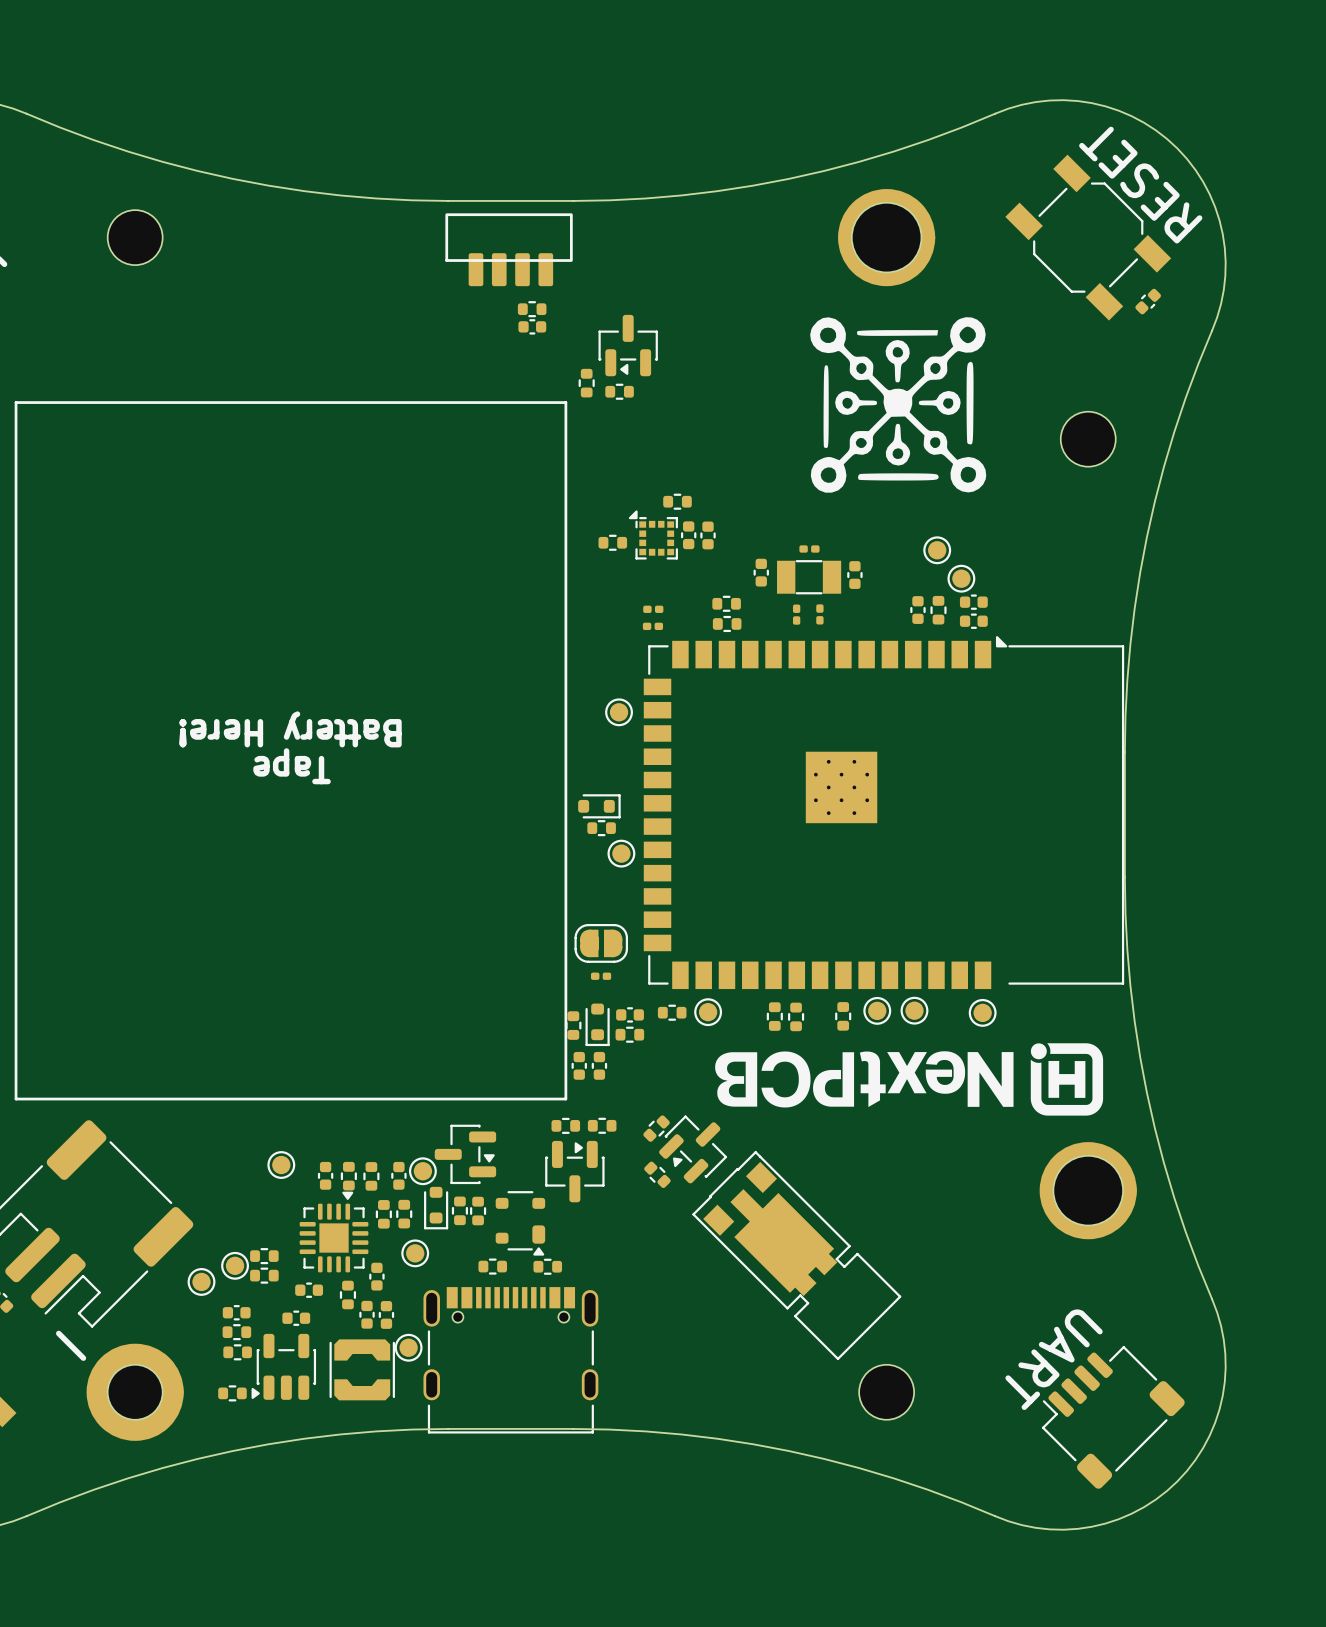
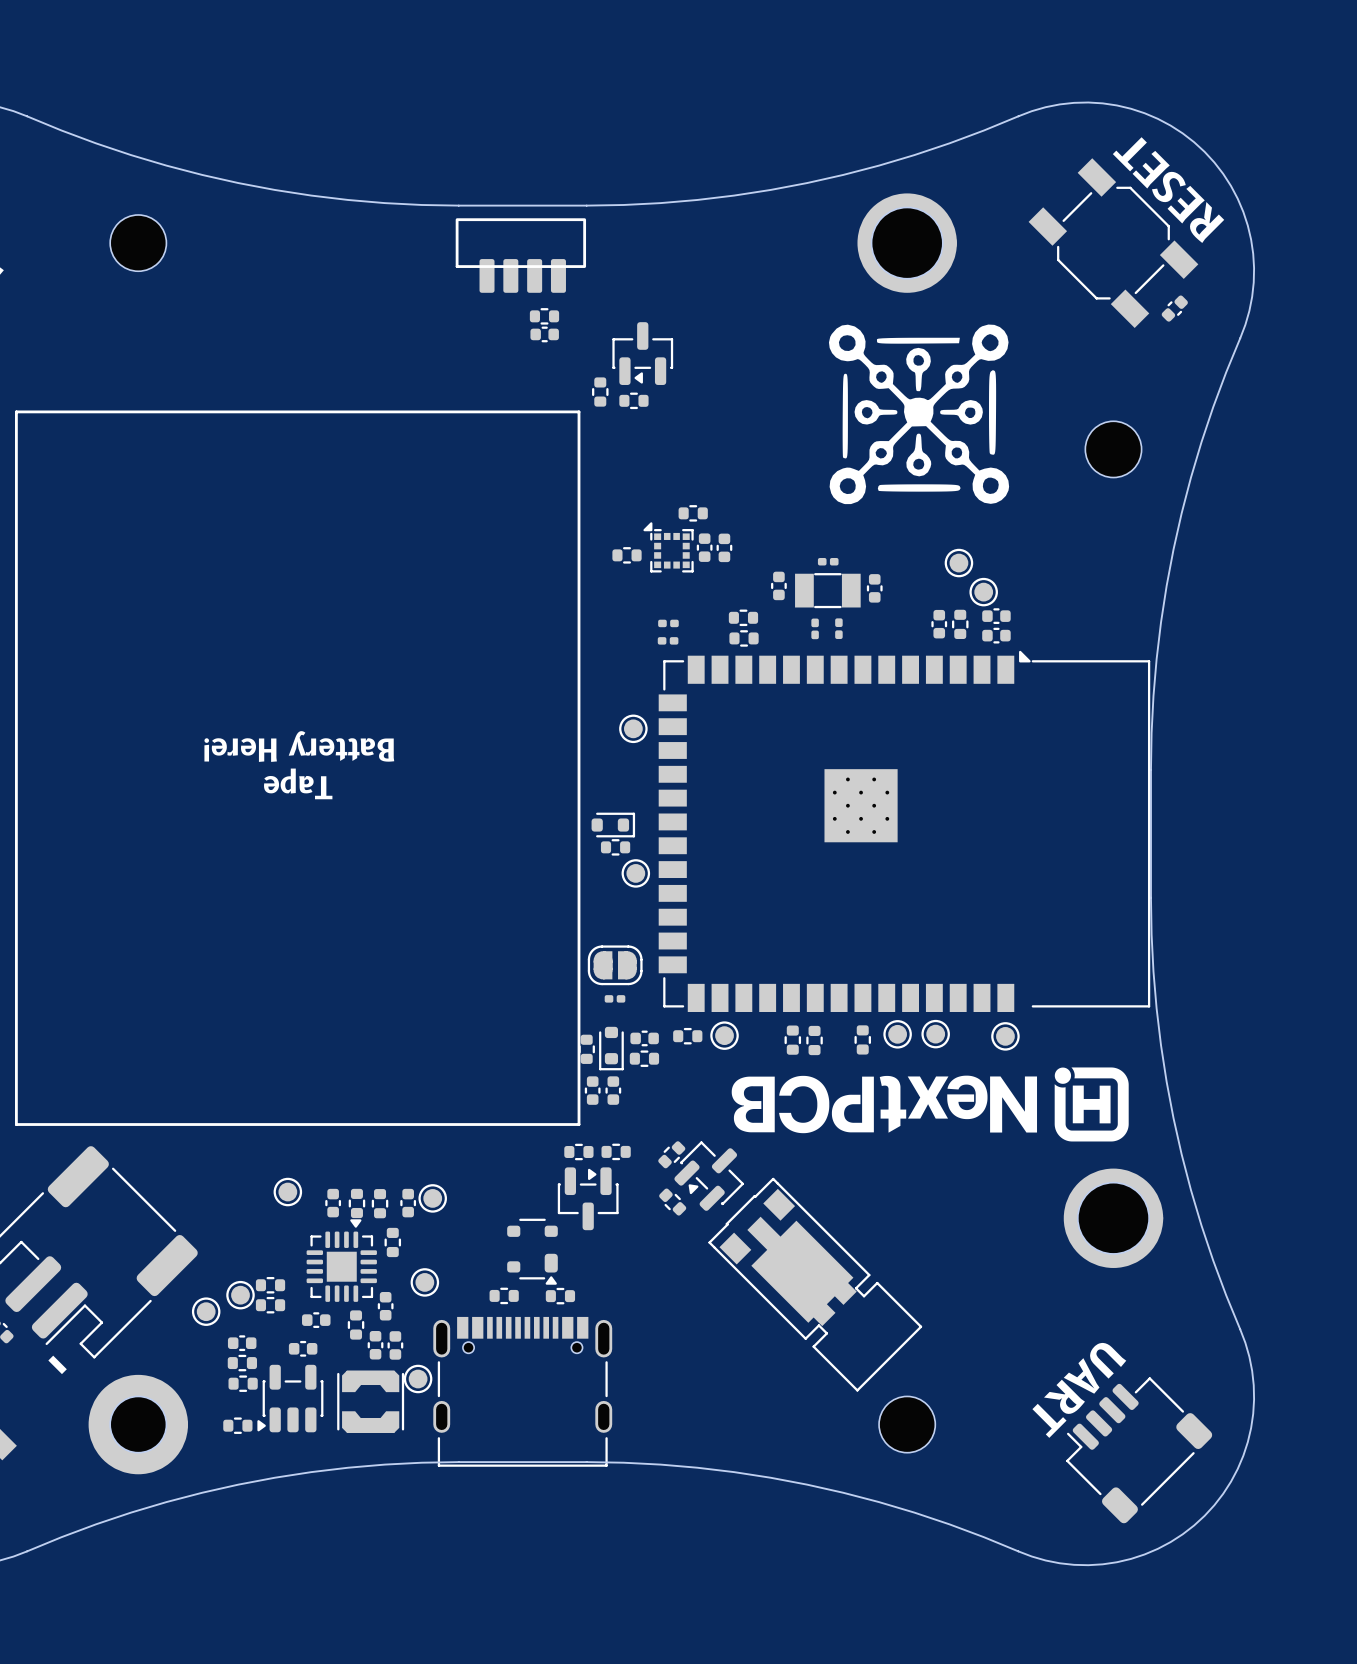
part: (465, 1154) -> none
part: (436, 1208) -> none
part: (459, 1210) -> none
part: (478, 1211) -> none
part: (404, 1214) -> none

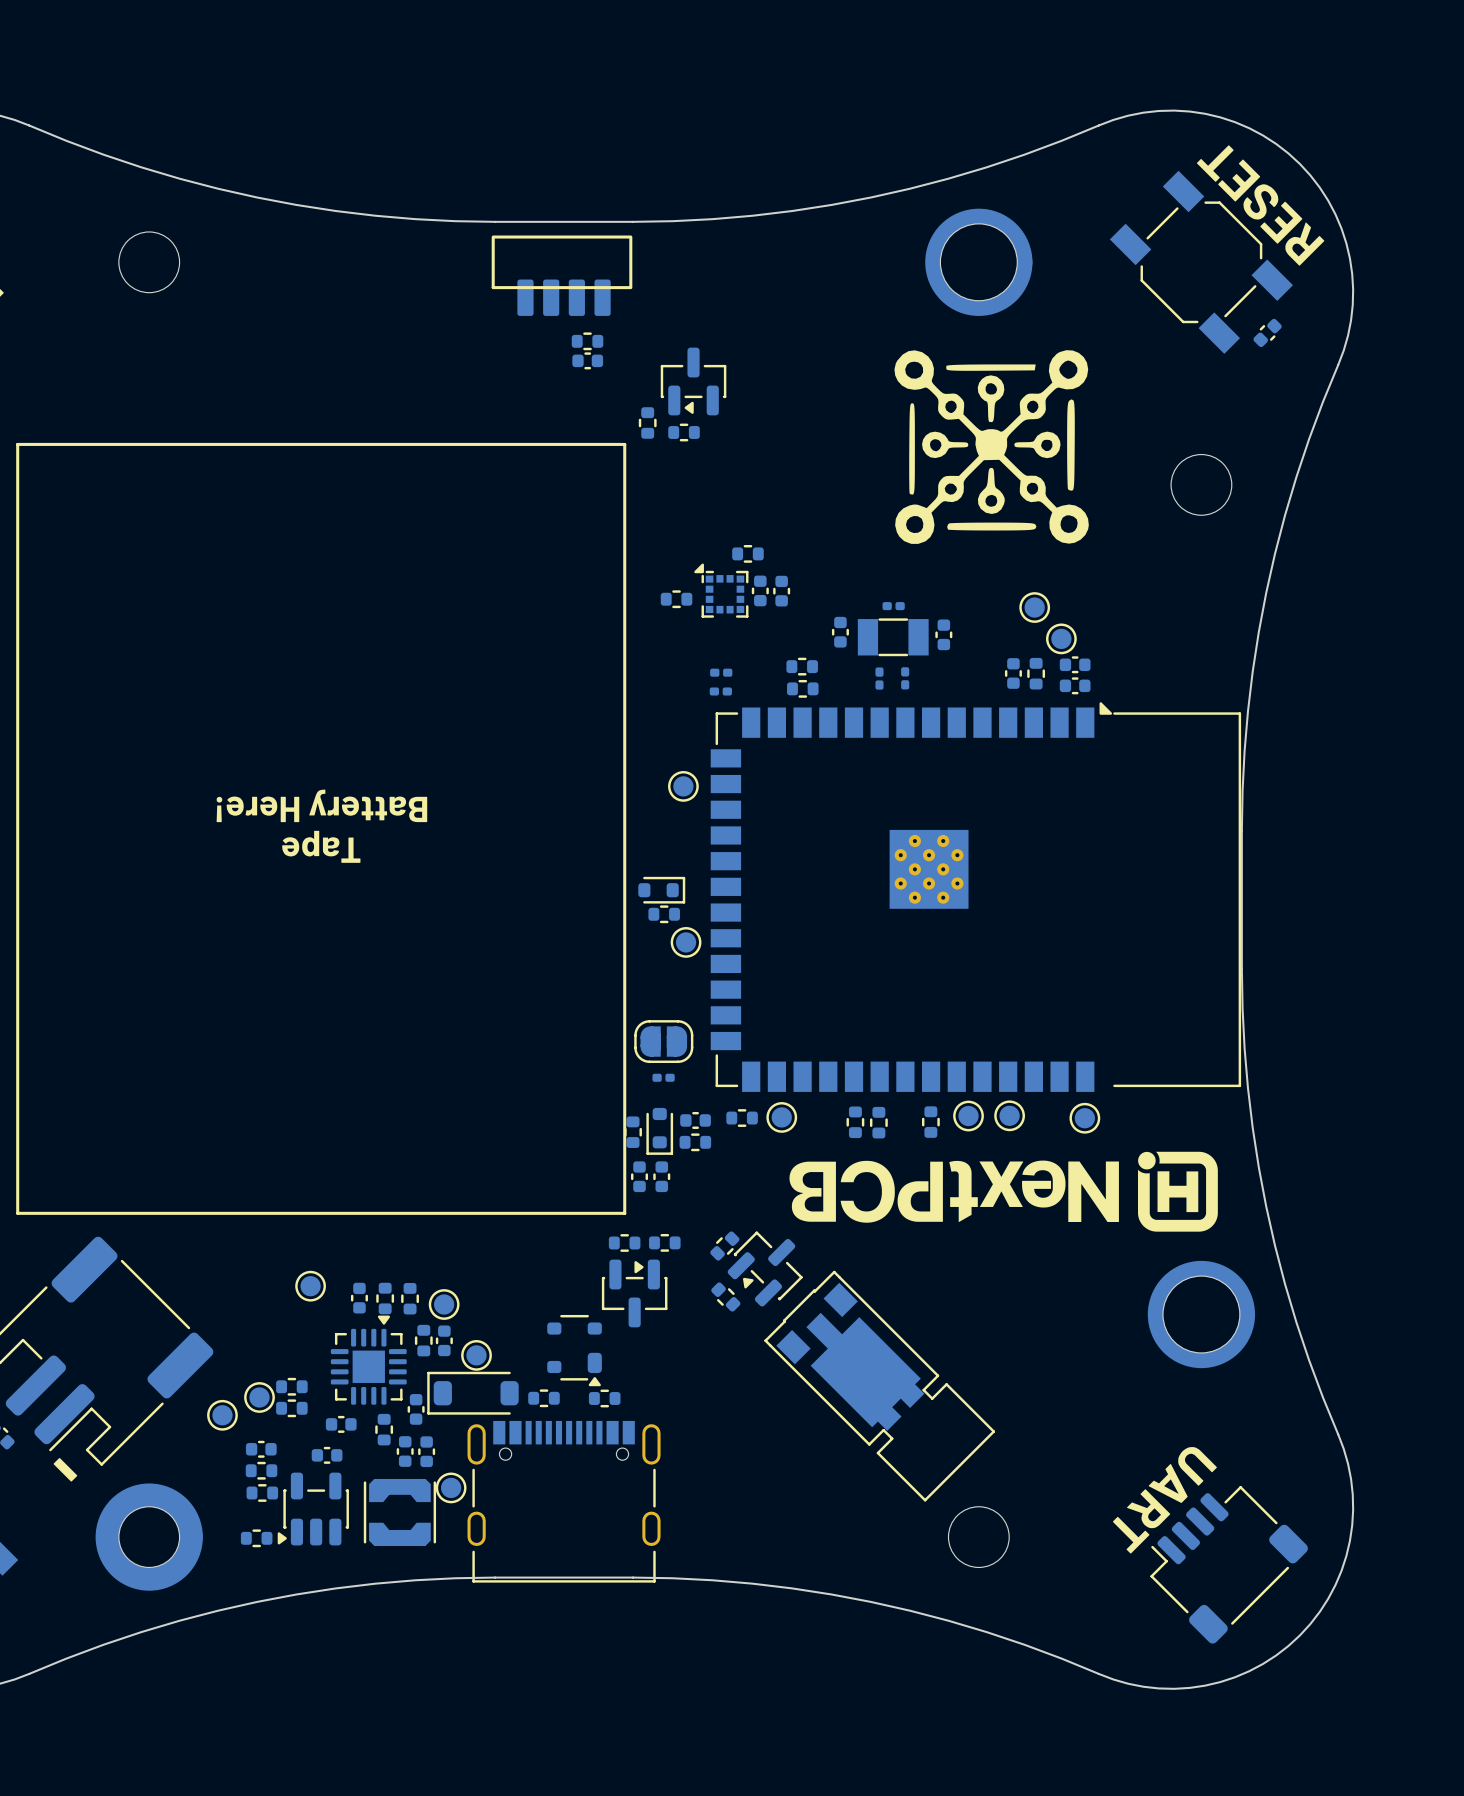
part footprint: [400, 1188, 417, 1218] -> [428, 1289, 460, 1320]
part: (432, 1198) -> none
part: none -> (444, 1340)
part: none -> (476, 1355)
part: (424, 1282) -> none
part: none -> (472, 1393)

